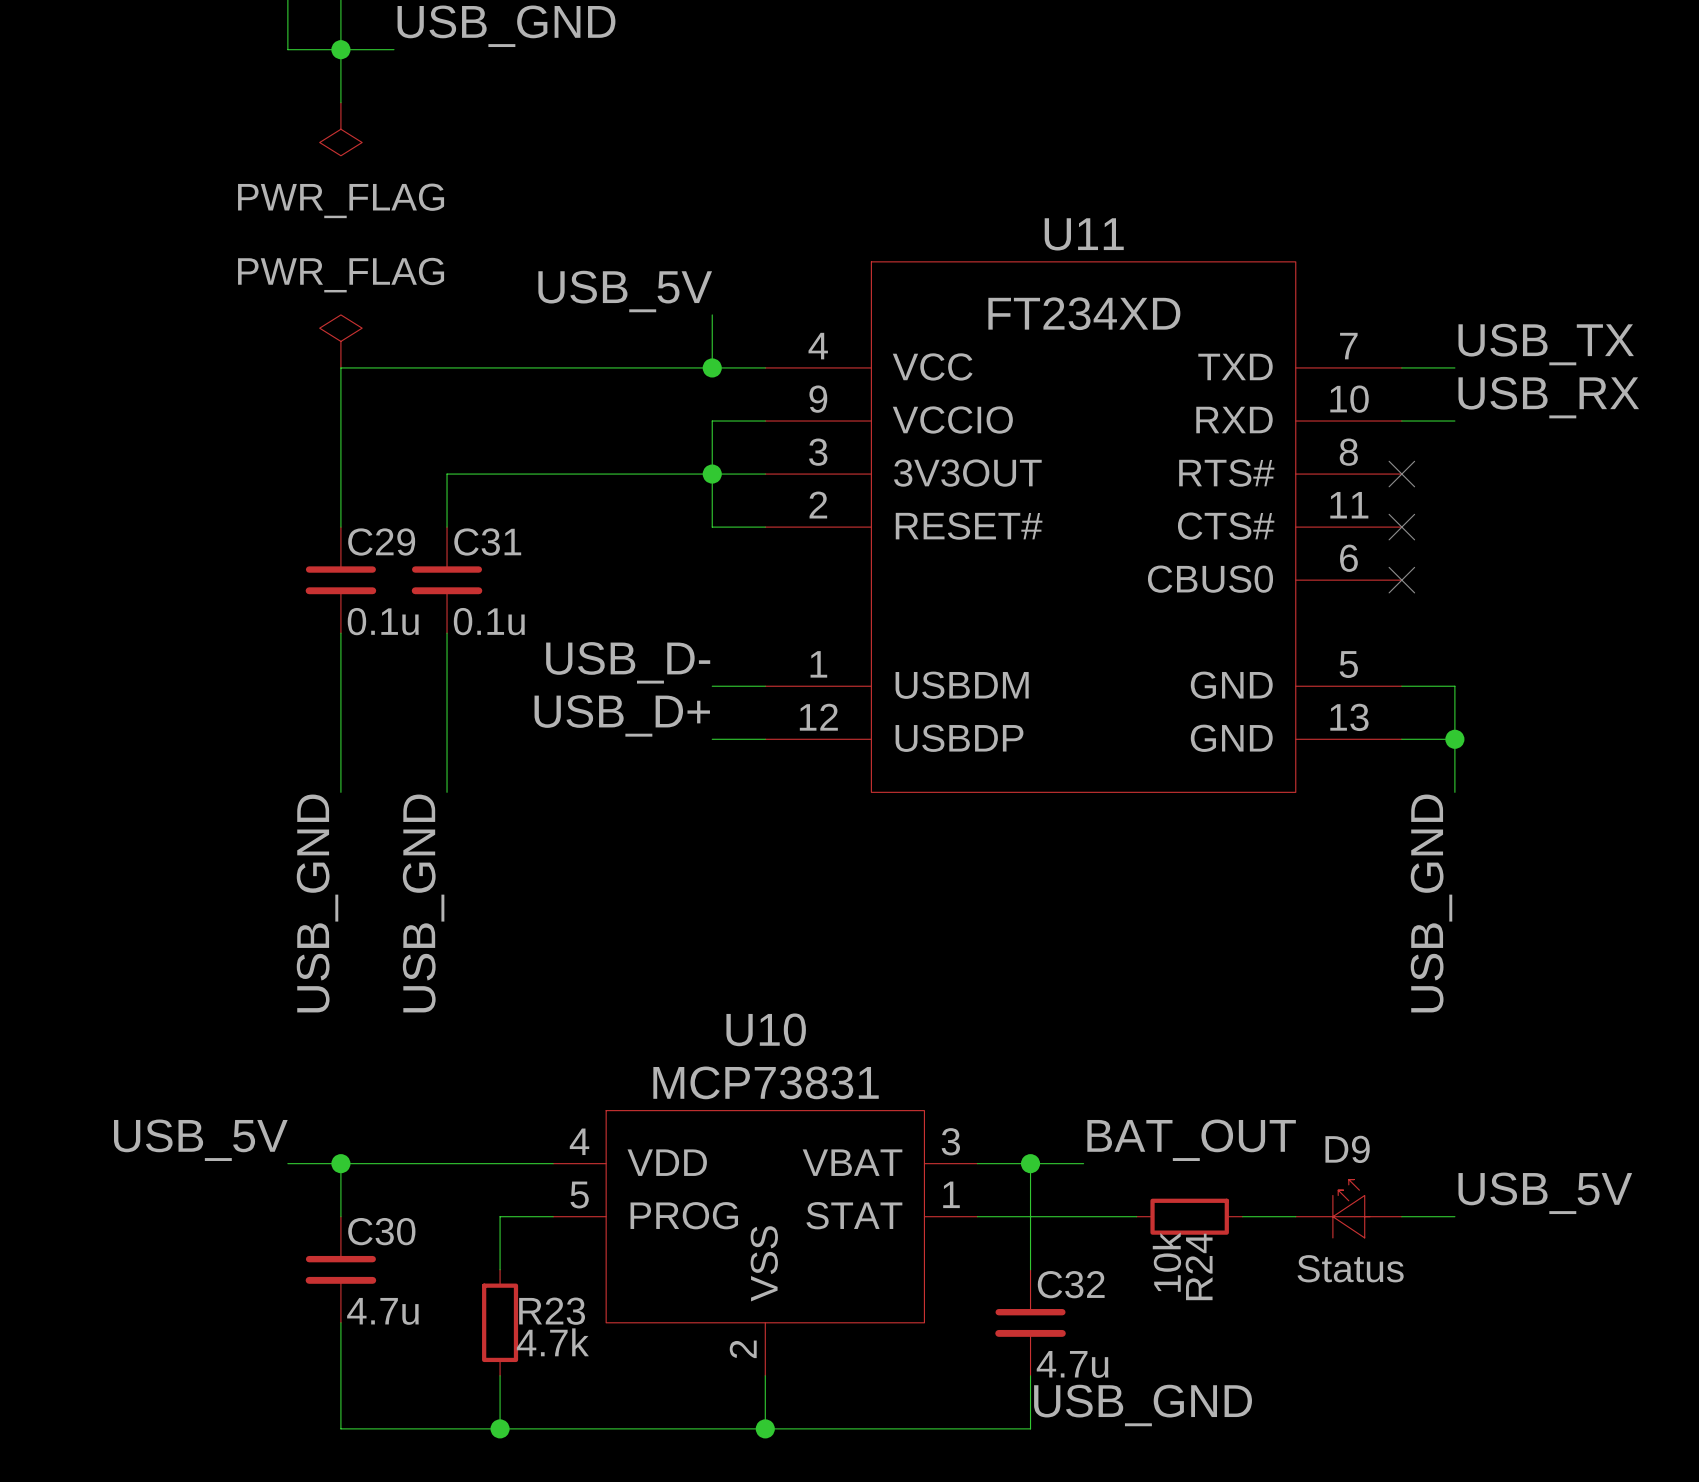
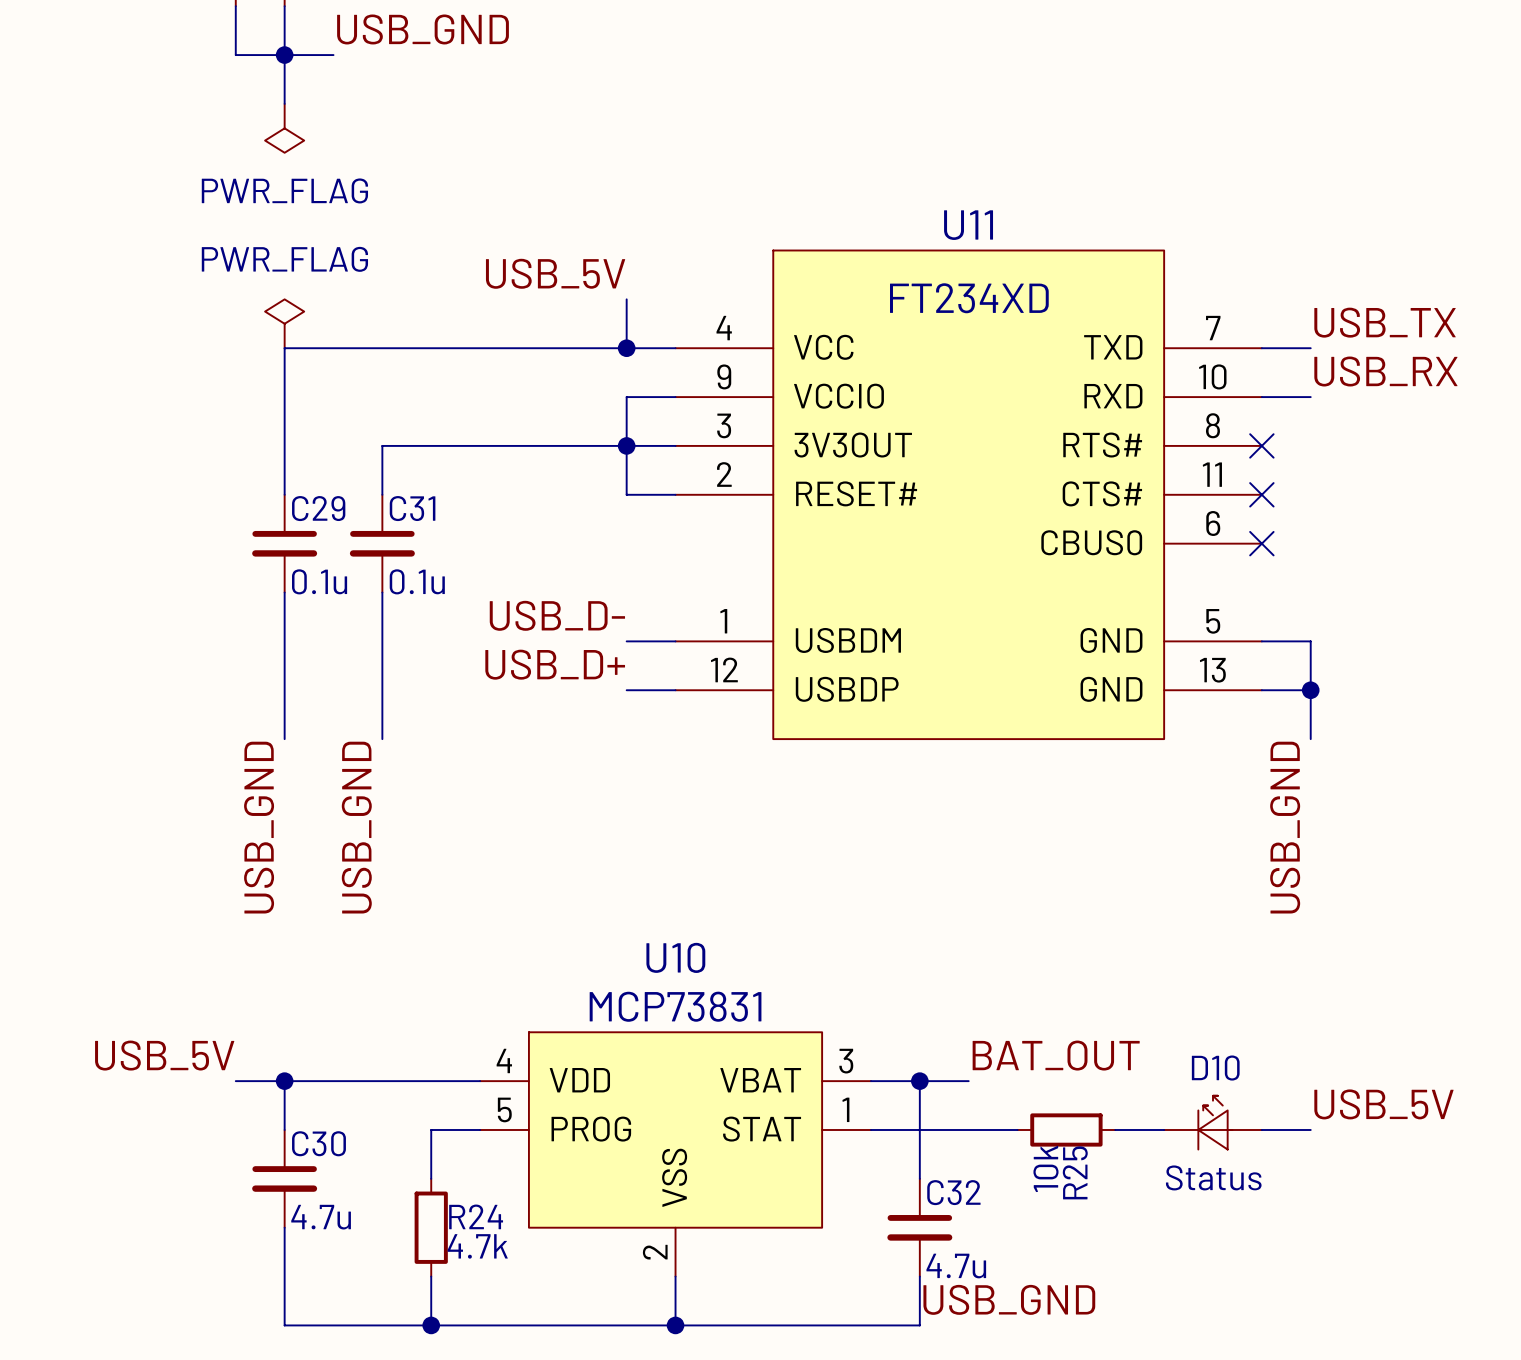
D9 name: D9 (1347, 1149) -> D10 (1215, 1068)
R24 name: R24 (1199, 1266) -> R25 (1075, 1172)
R23 name: R23 (552, 1311) -> R24 (476, 1216)

